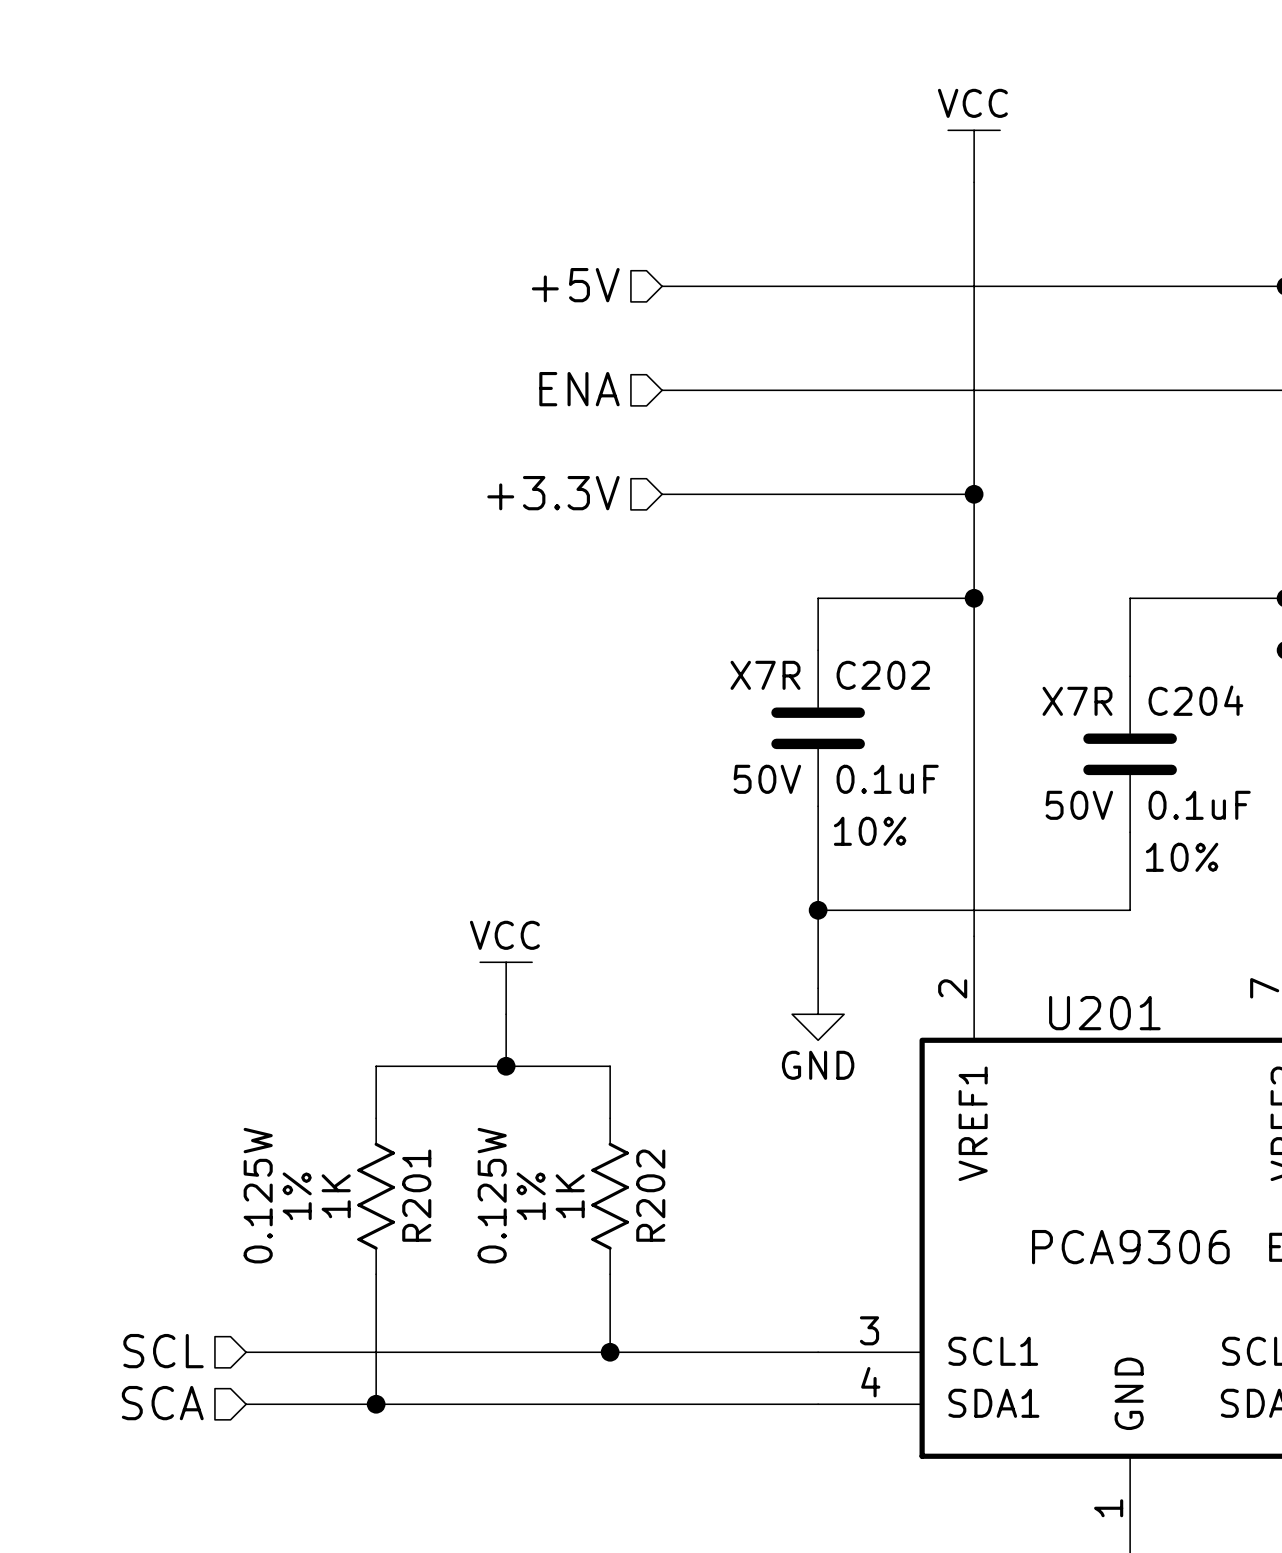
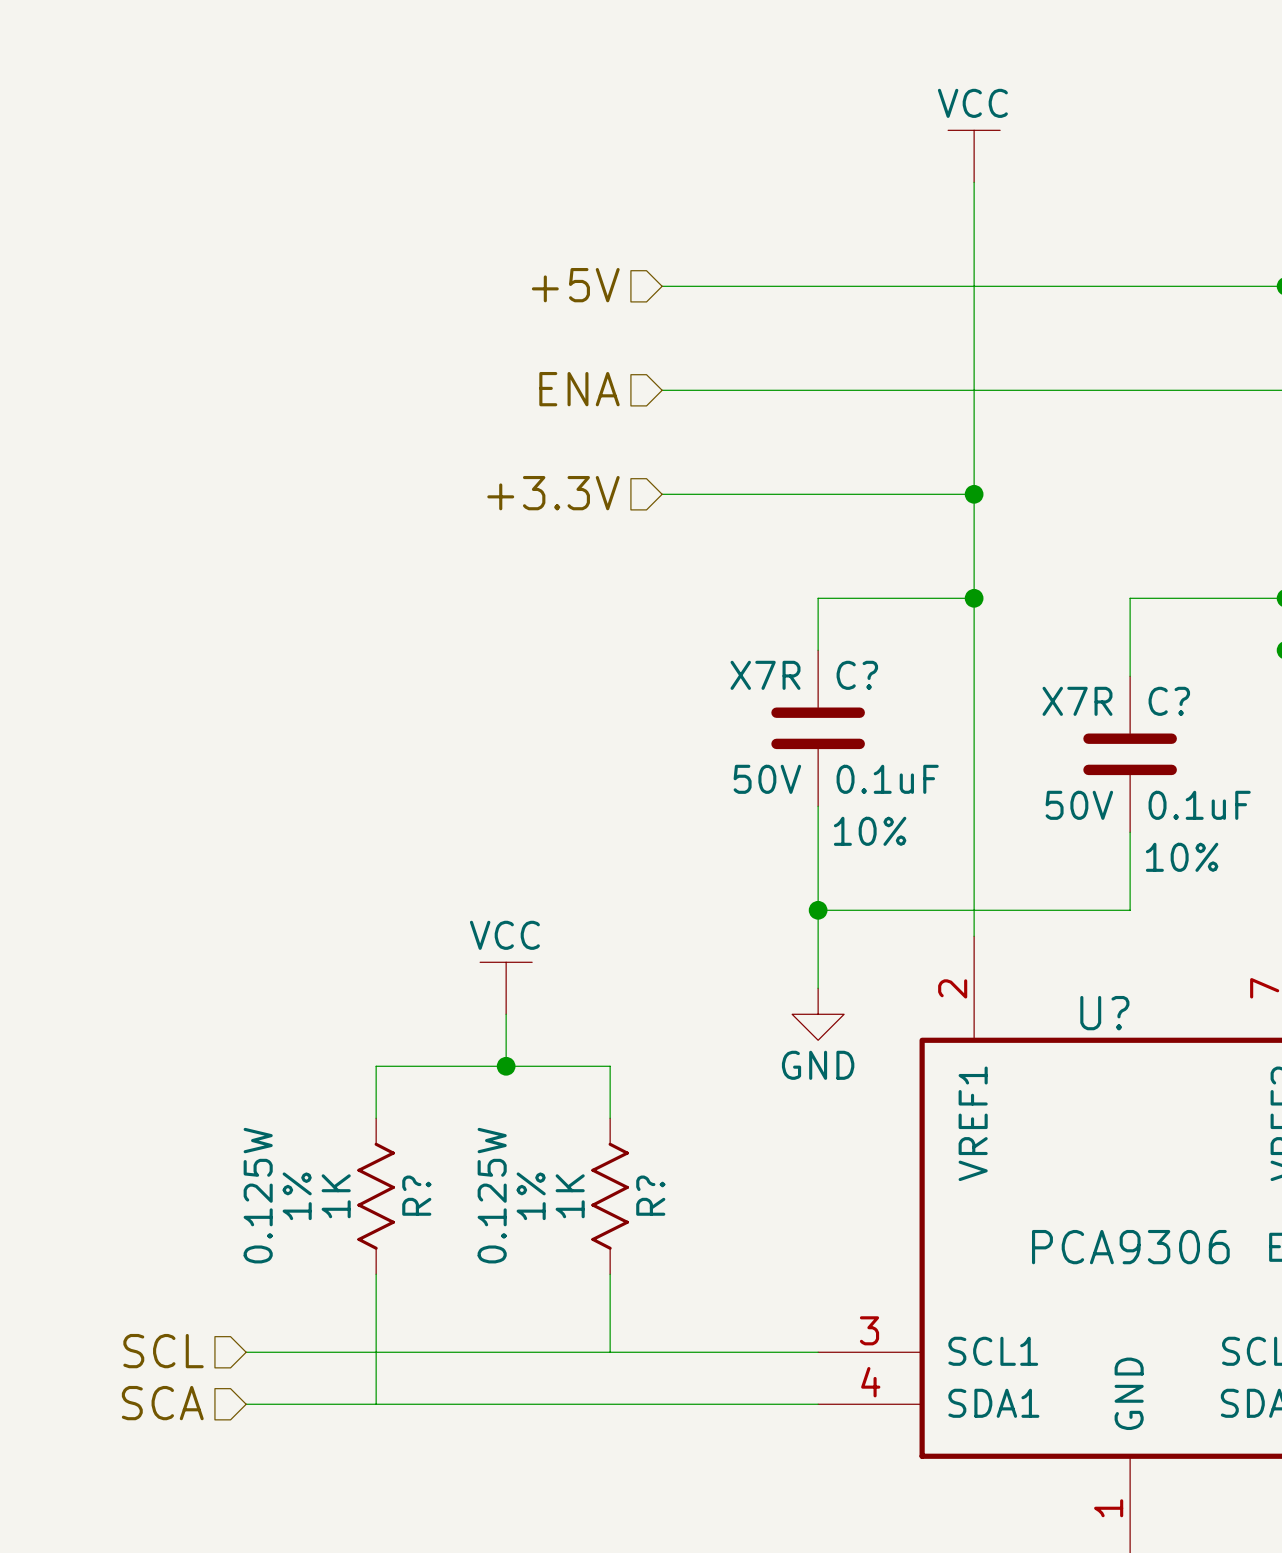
C202 name: C202 (883, 675) -> C? (857, 675)
C204 name: C204 (1195, 700) -> C? (1169, 701)
U201 name: U201 (1104, 1013) -> U? (1104, 1013)
R201 name: R201 (416, 1195) -> R? (416, 1195)
R202 name: R202 (650, 1195) -> R? (650, 1195)
junction: (610, 1352) -> none
junction: (376, 1404) -> none

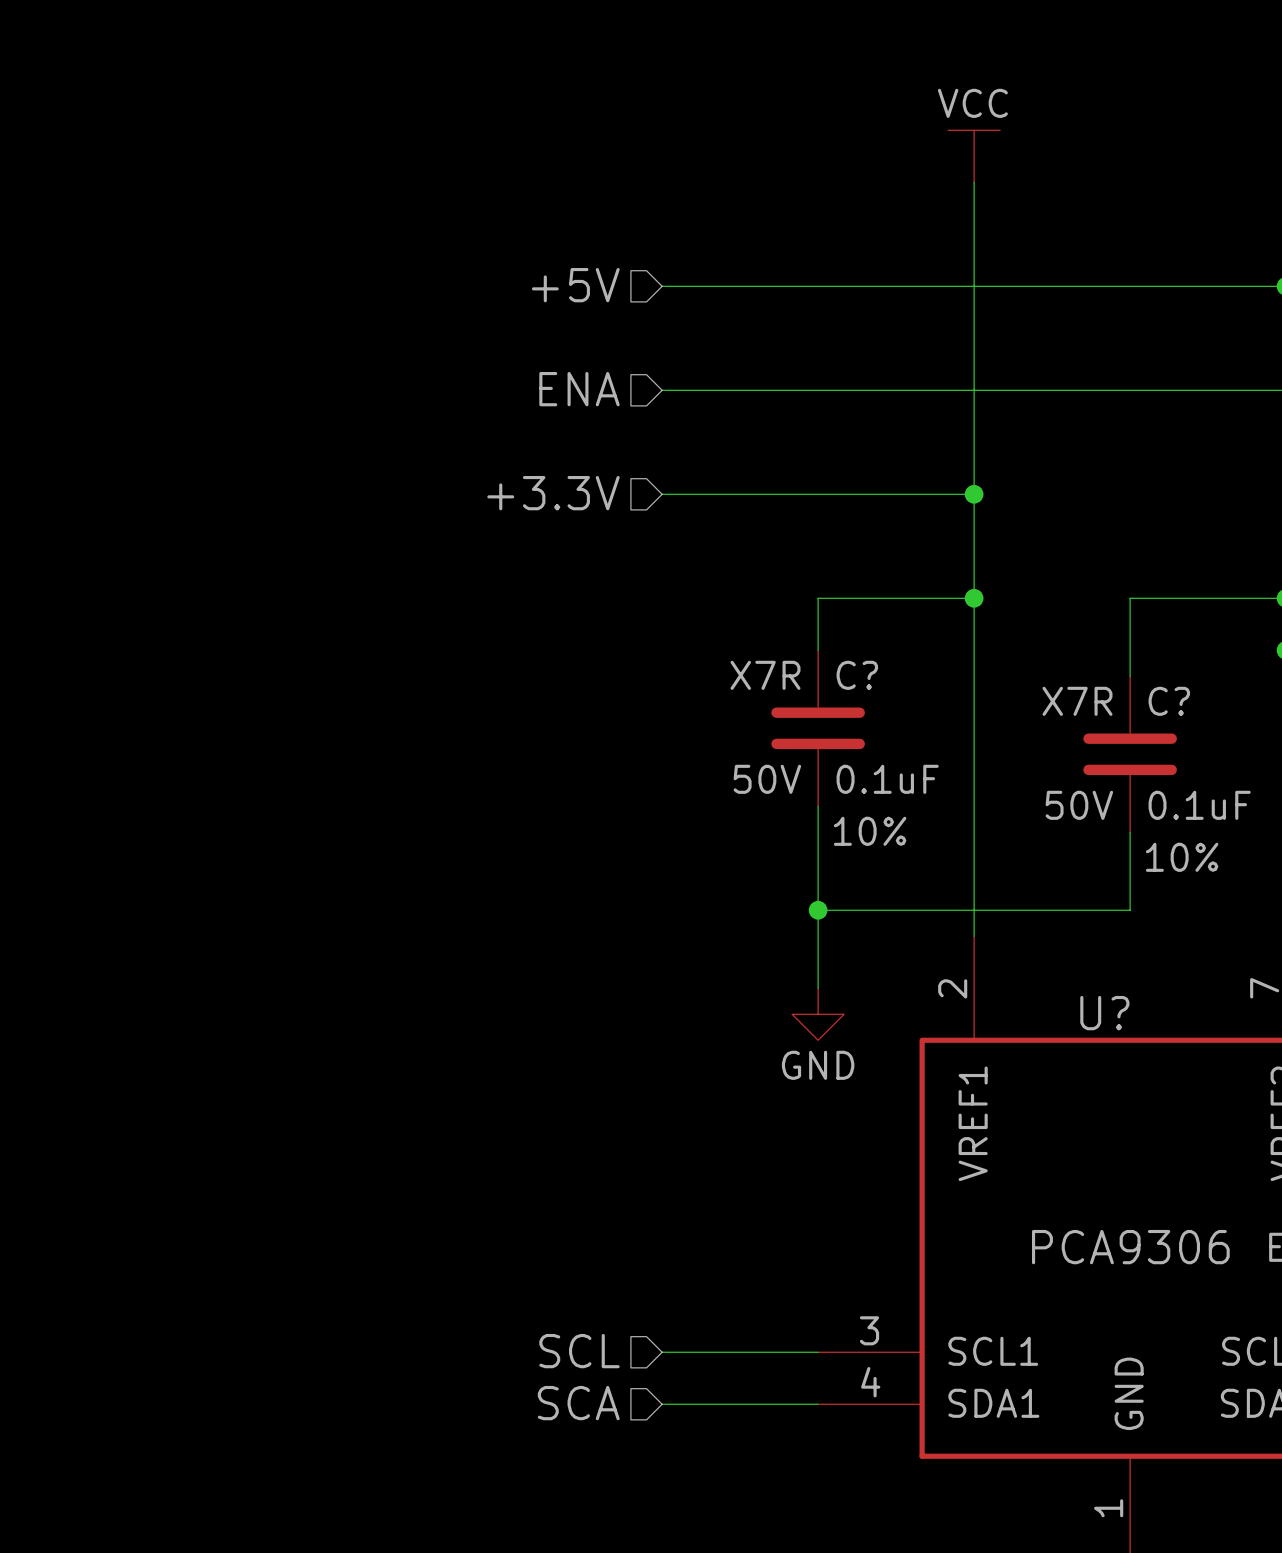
power symbol: VCC (506, 988) -> none
wire: (506, 1014) (506, 1066) -> none
junction: (506, 1066) -> none
wire: (376, 1118) (376, 1066) (610, 1066) (610, 1118) -> none
R?: 1K (376, 1196) -> none
R?: 1K (610, 1196) -> none
wire: (376, 1274) (376, 1404) -> none
wire: (610, 1274) (610, 1352) -> none
hierarchical label position: SCL (163, 1351) -> SCL (579, 1351)
wire: (246, 1352) (662, 1352) -> none
hierarchical label position: SCA (162, 1403) -> SCA (578, 1403)
wire: (246, 1404) (662, 1404) -> none

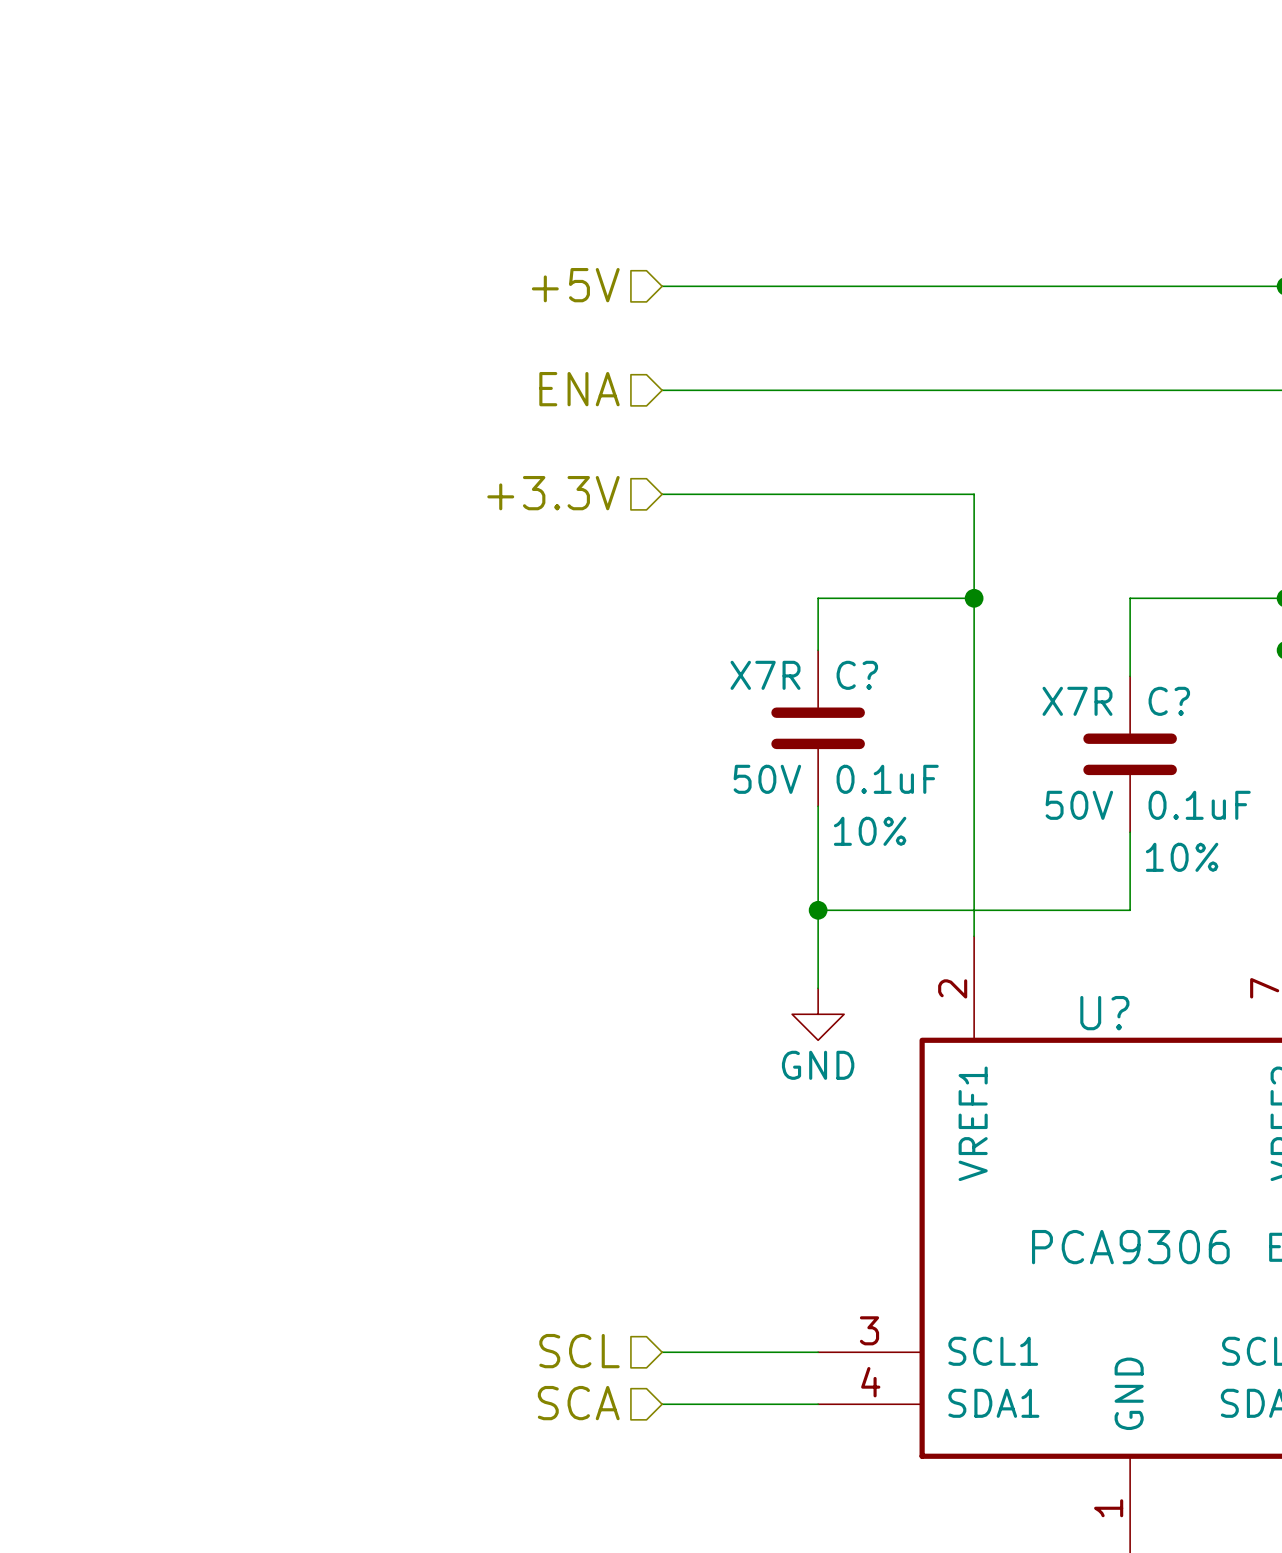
power symbol: VCC (974, 156) -> none
wire: (974, 182) (974, 494) -> none
junction: (974, 494) -> none

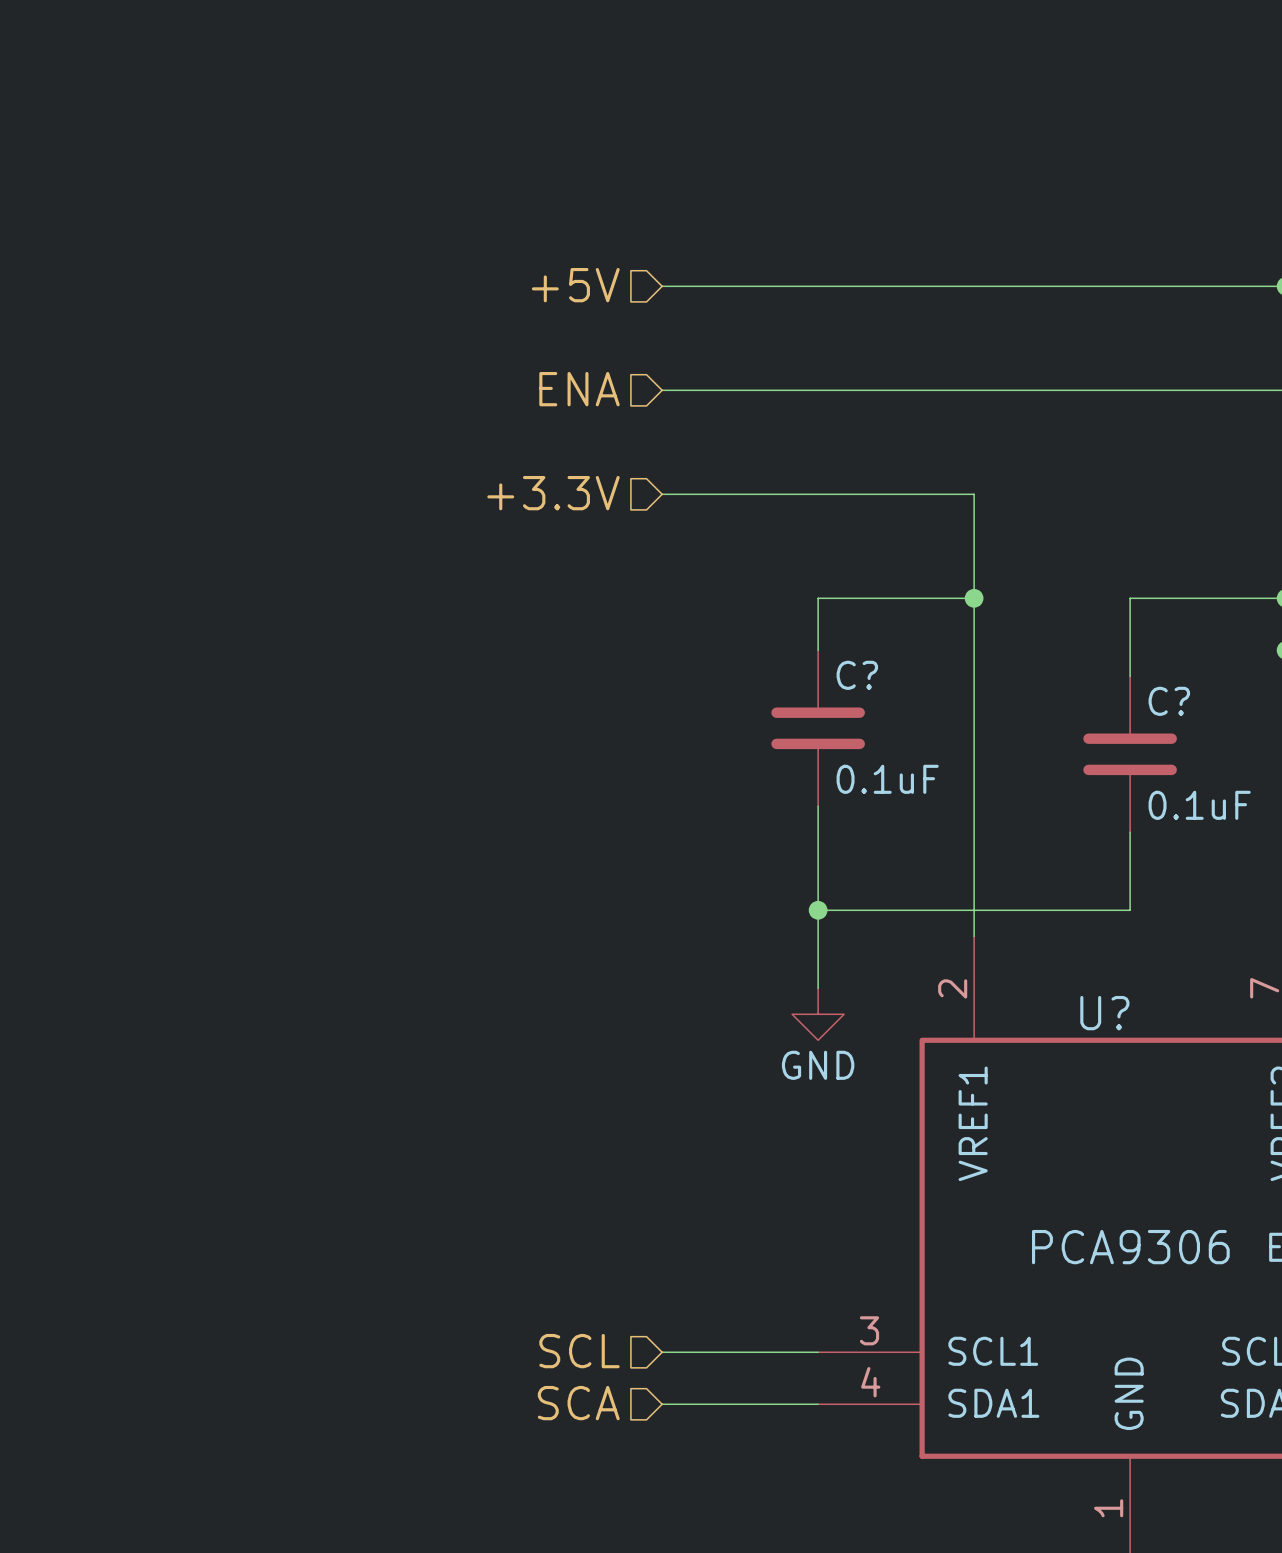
C? text: X7R (765, 675) -> none
C? text: X7R (1077, 701) -> none
C? text: 50V (767, 779) -> none
C? text: 50V (1079, 805) -> none
C? text: 10% (870, 831) -> none
C? text: 10% (1182, 857) -> none

